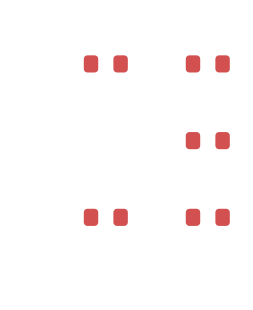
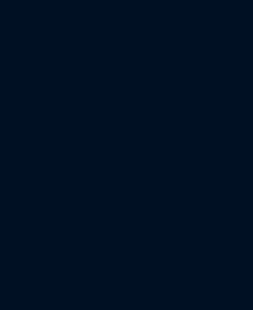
part: (105, 63) -> none
part: (207, 63) -> none
part: (207, 140) -> none
part: (105, 217) -> none
part: (207, 217) -> none

